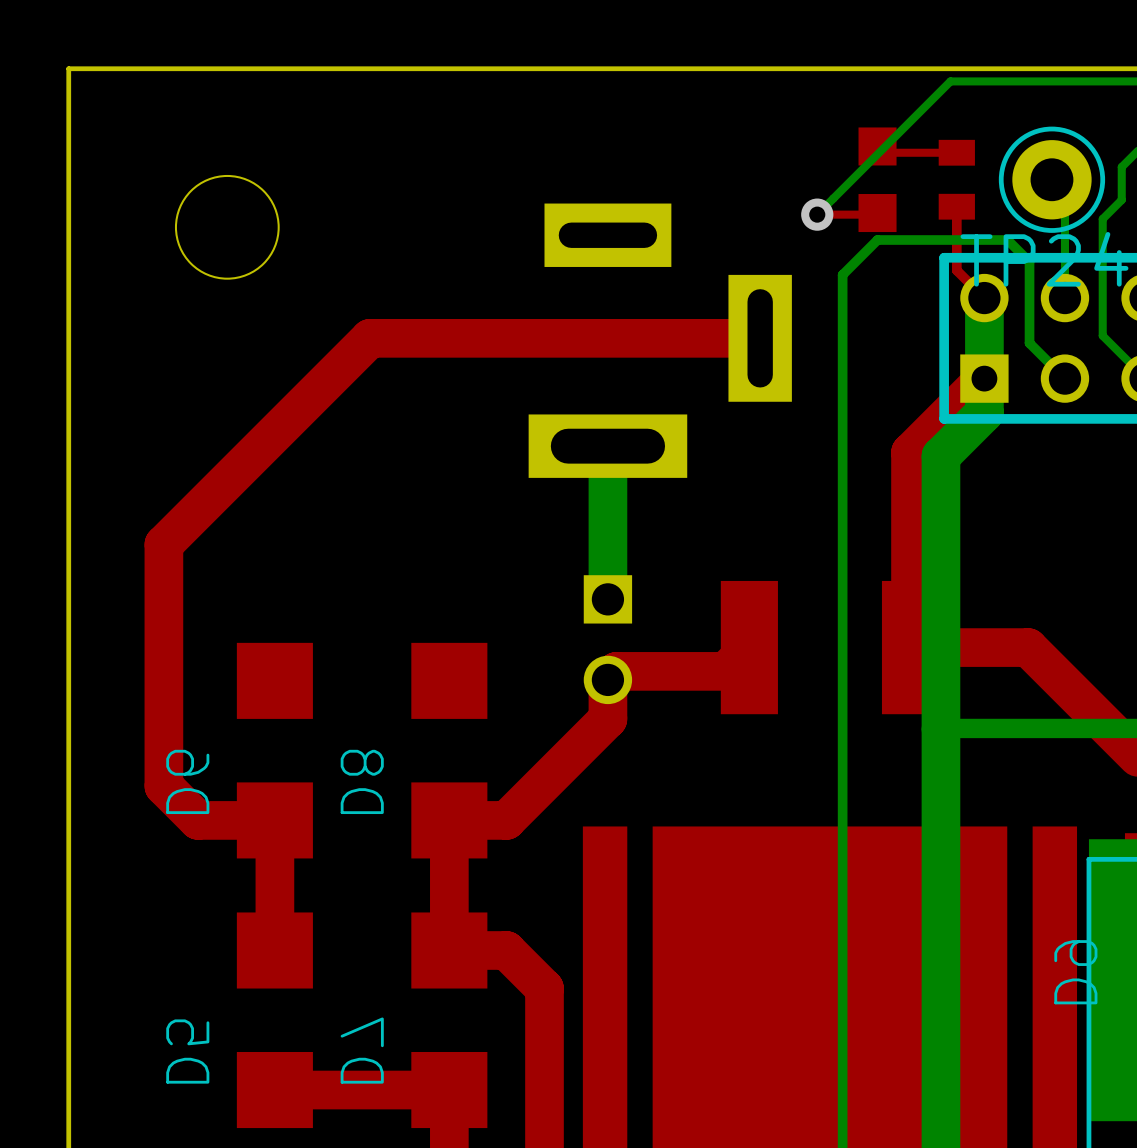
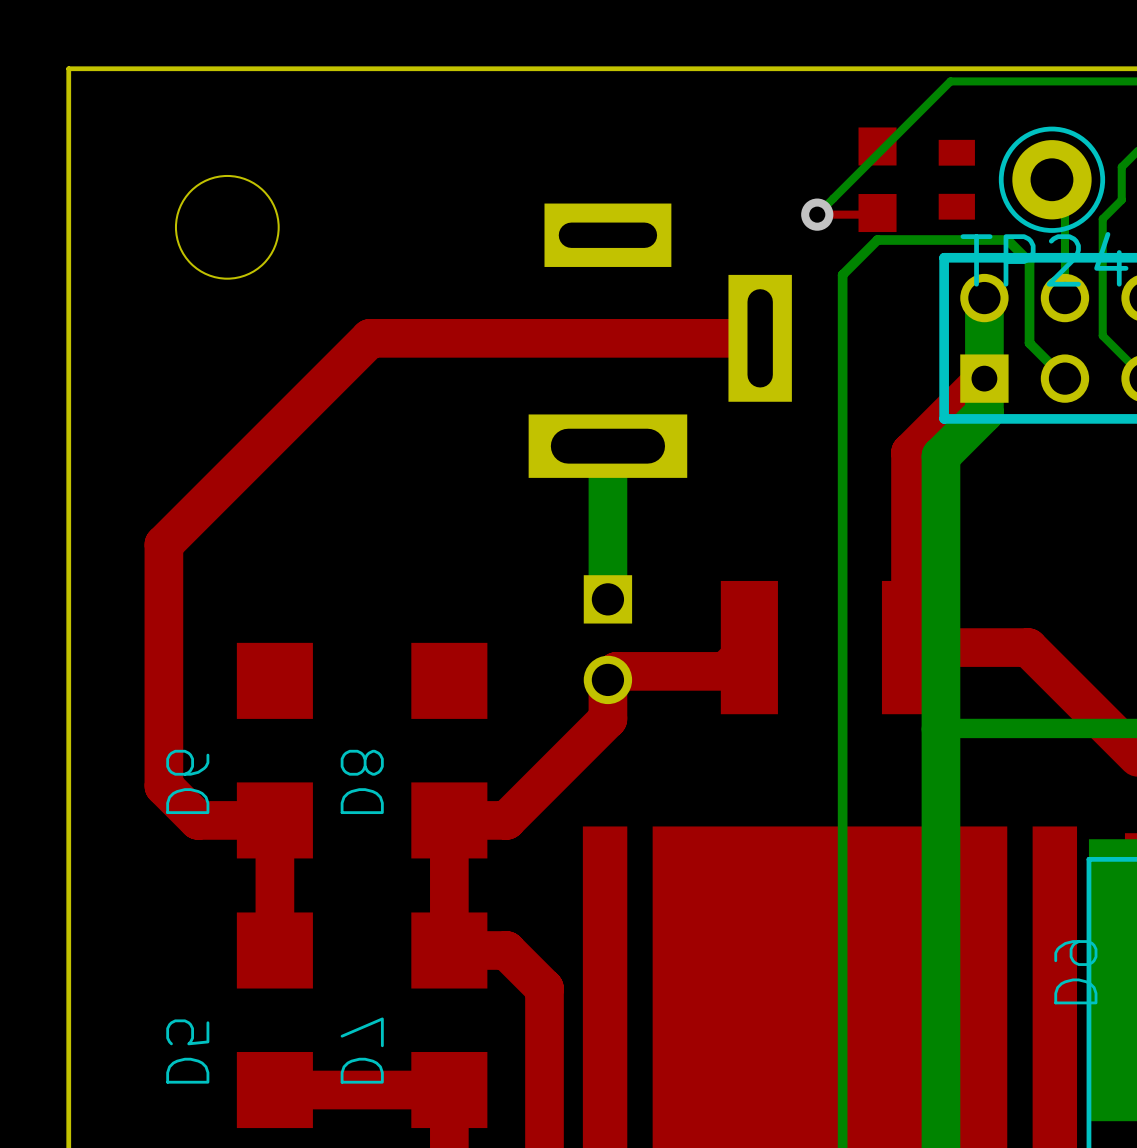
top track: (877, 146) (883, 152) (956, 152) -> none
top track: (956, 206) (956, 270) (984, 298) -> none

